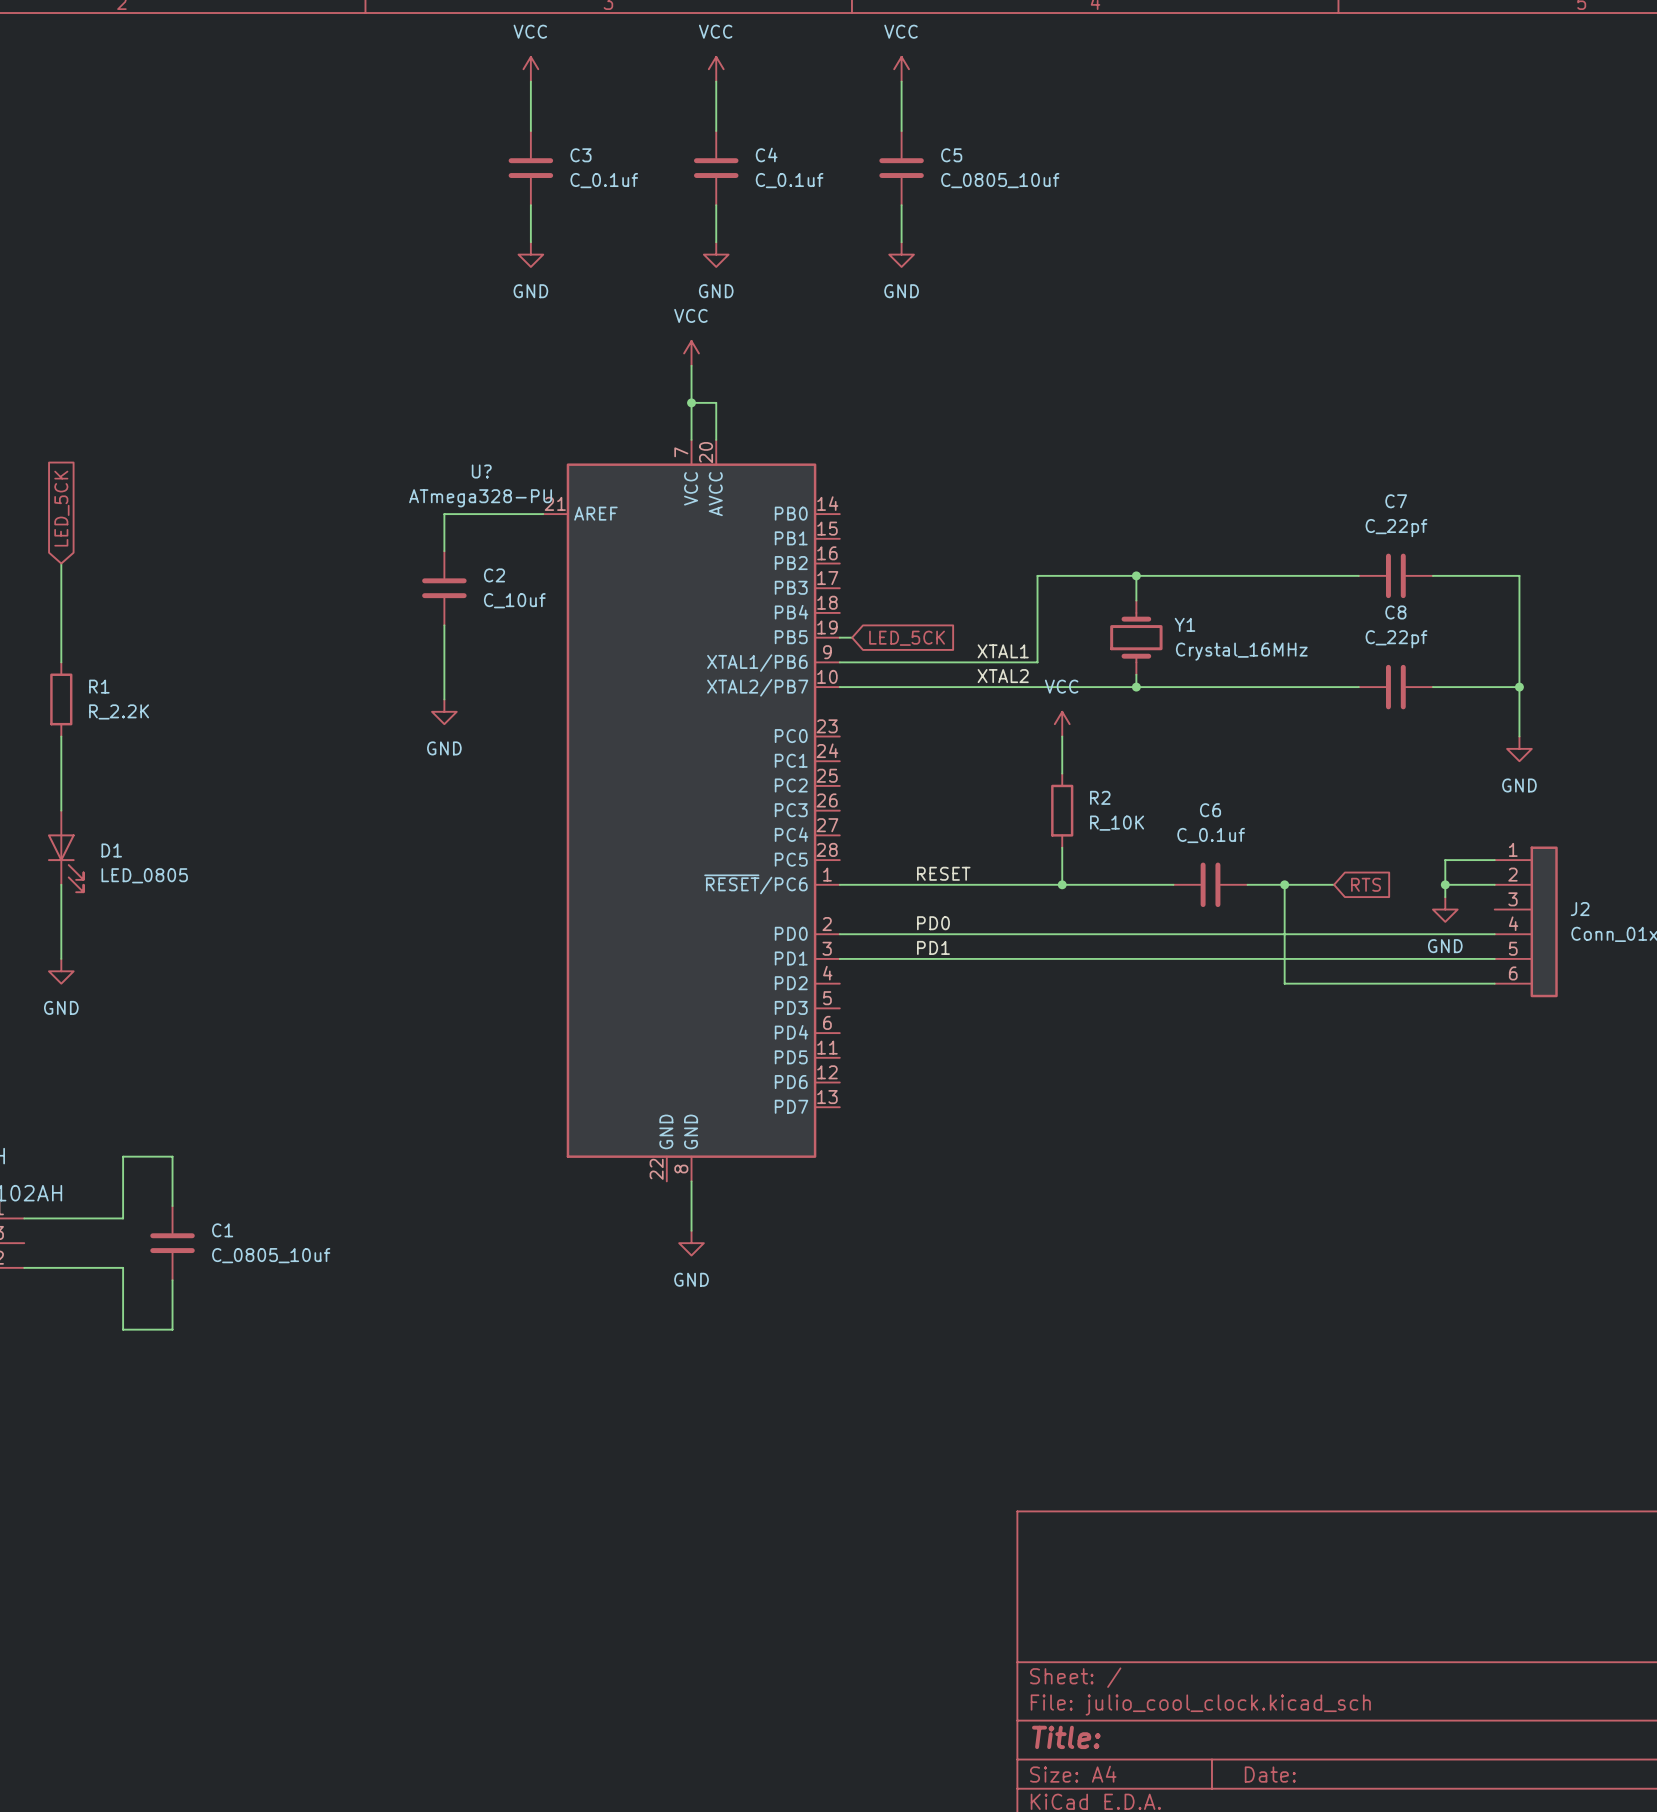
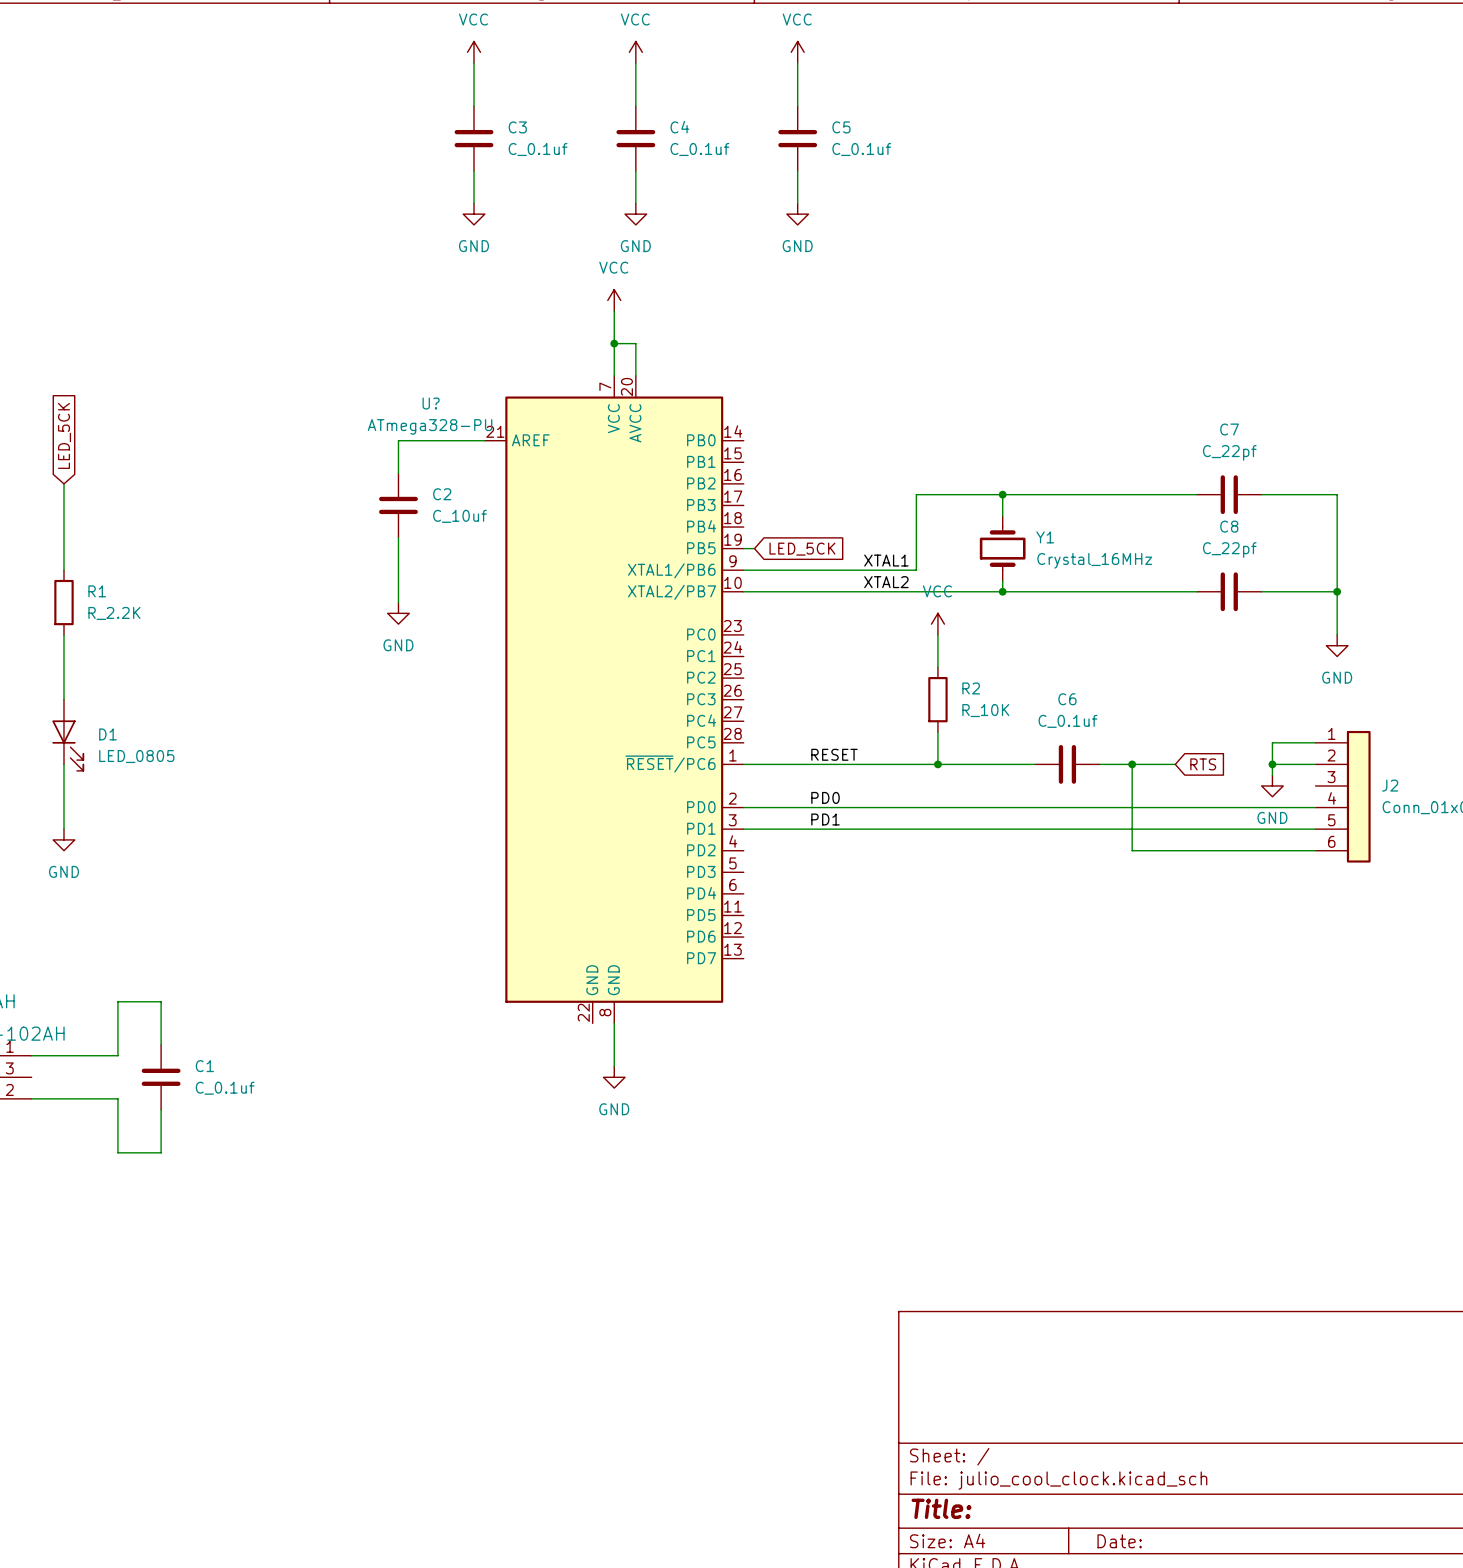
C5 value: C_0805_10uf (1000, 180) -> C_0.1uf (861, 149)
C1 value: C_0805_10uf (271, 1255) -> C_0.1uf (225, 1088)

